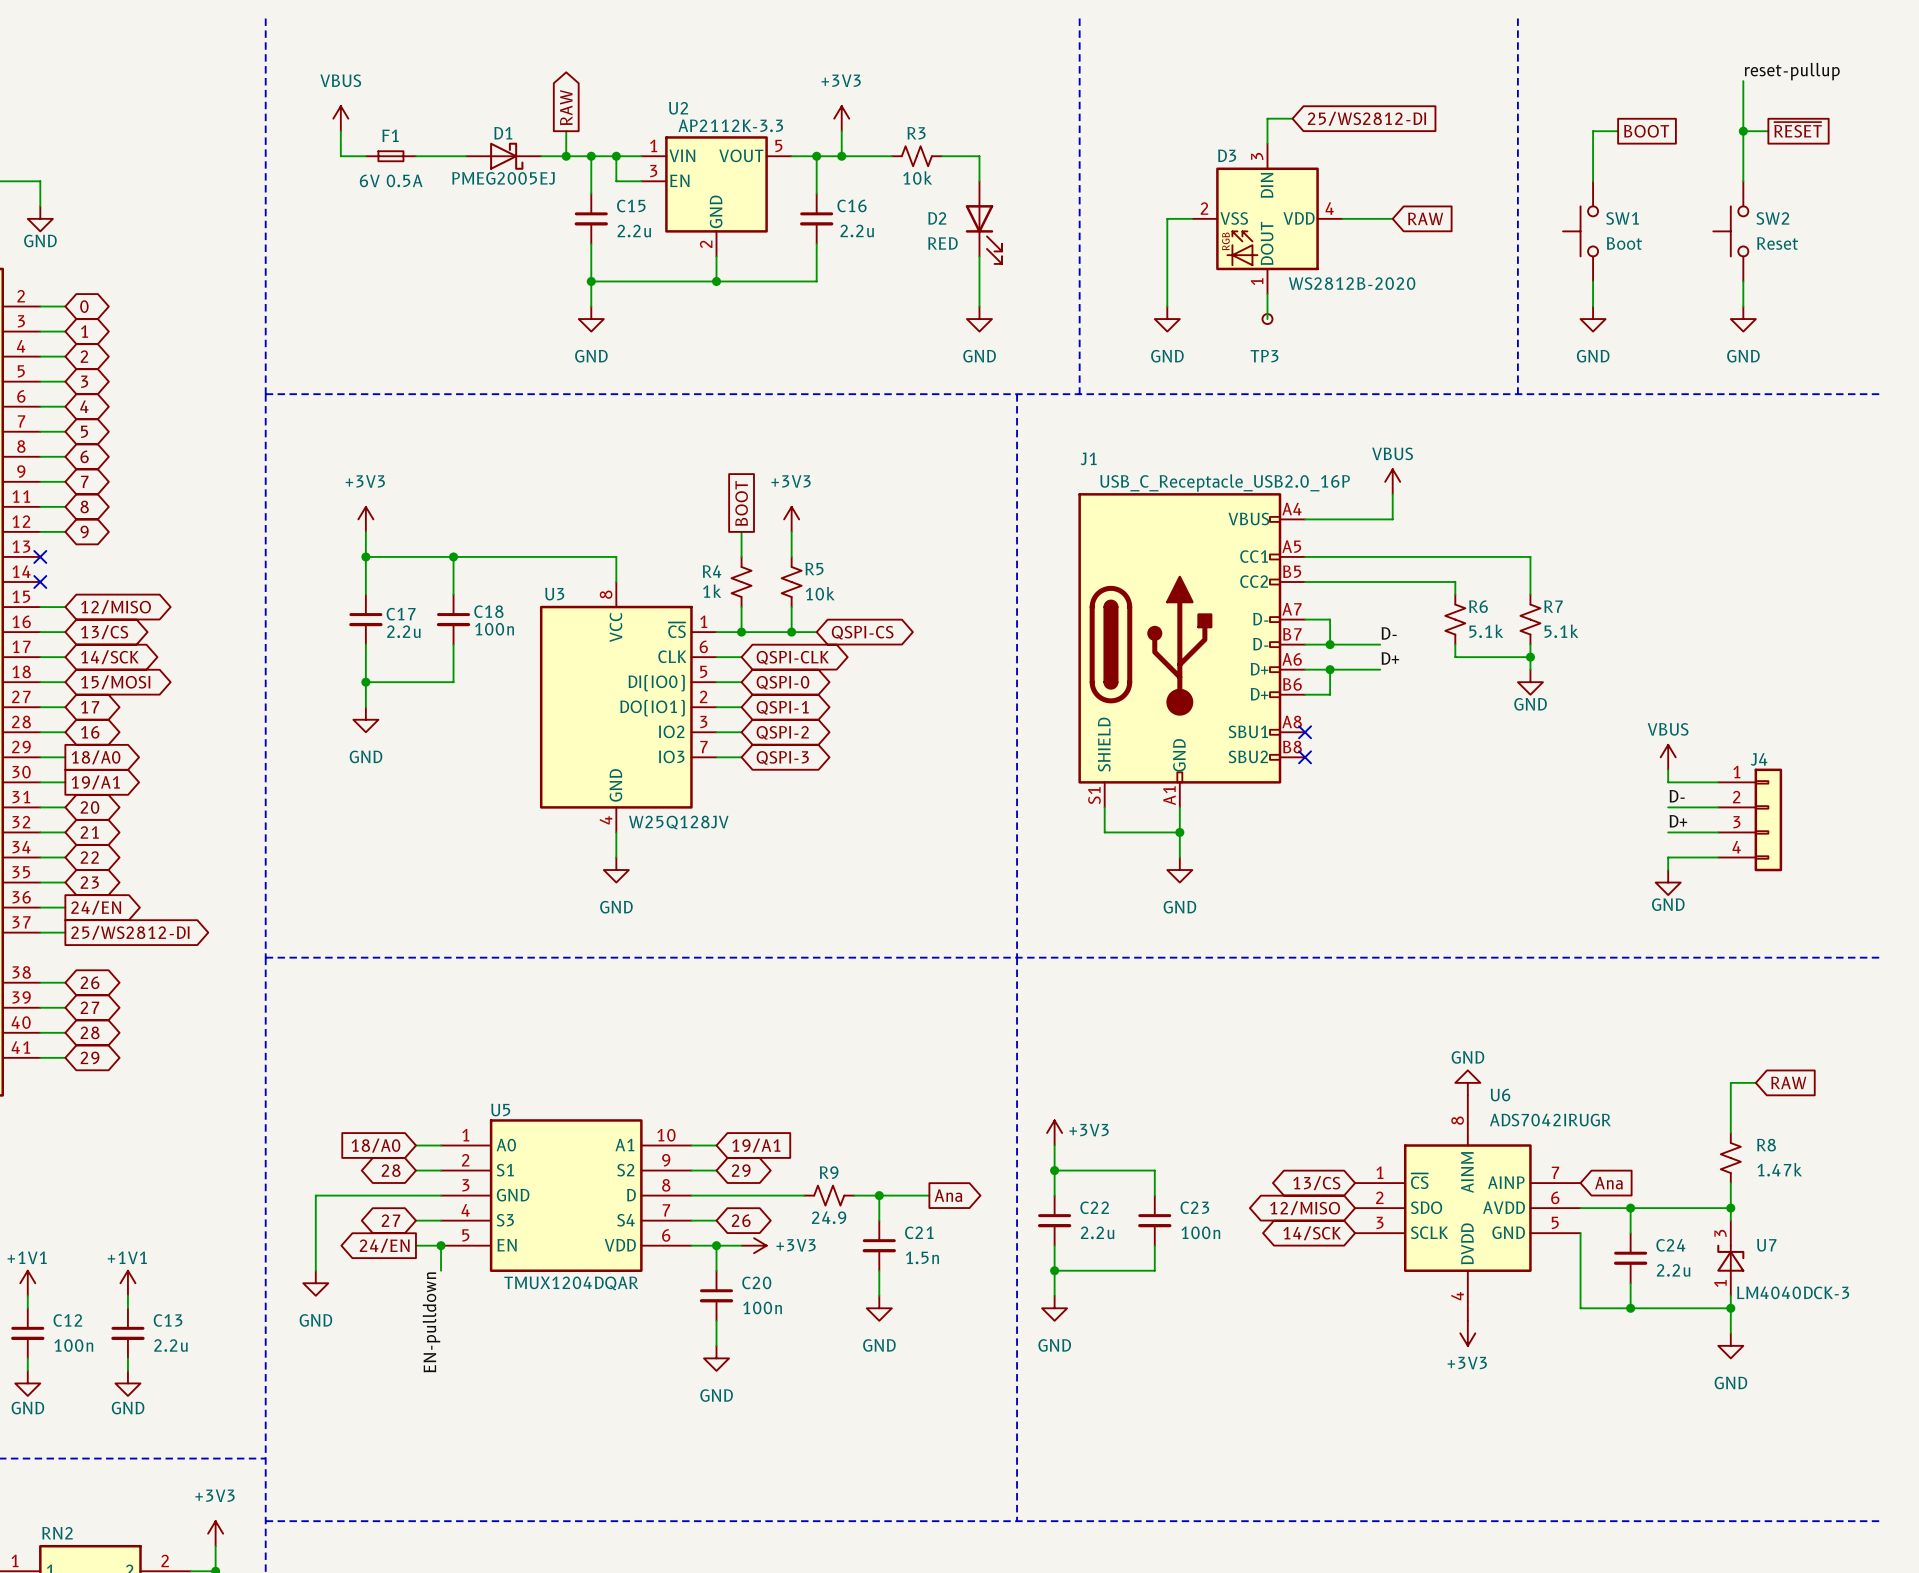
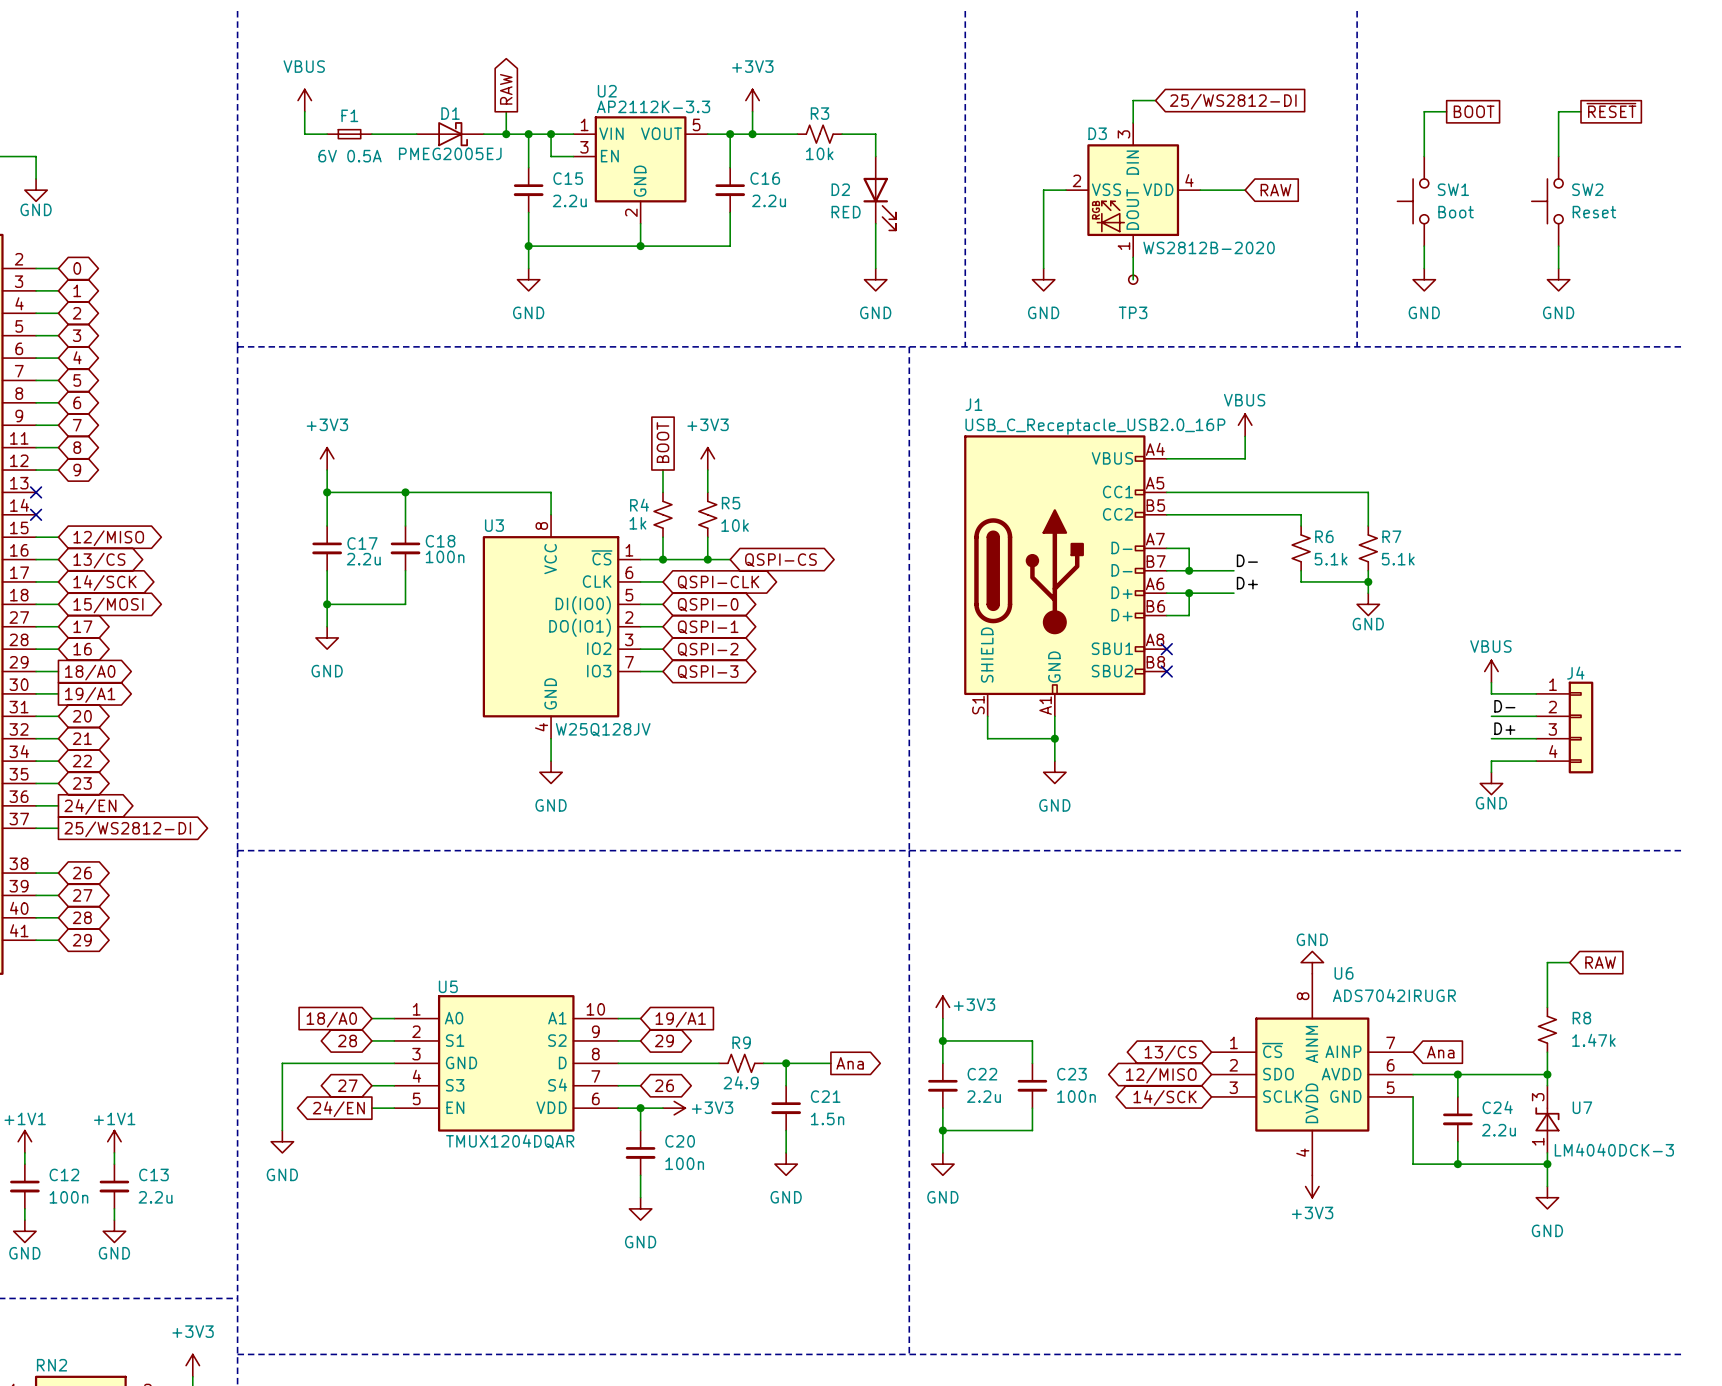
label: reset-pullup (1792, 71) -> none
wire: (1743, 81) (1743, 131) -> none
junction: (1743, 131) -> none
wire: (441, 1245) (441, 1270) -> none
junction: (441, 1245) -> none
label: EN-pulldown (431, 1322) -> none

